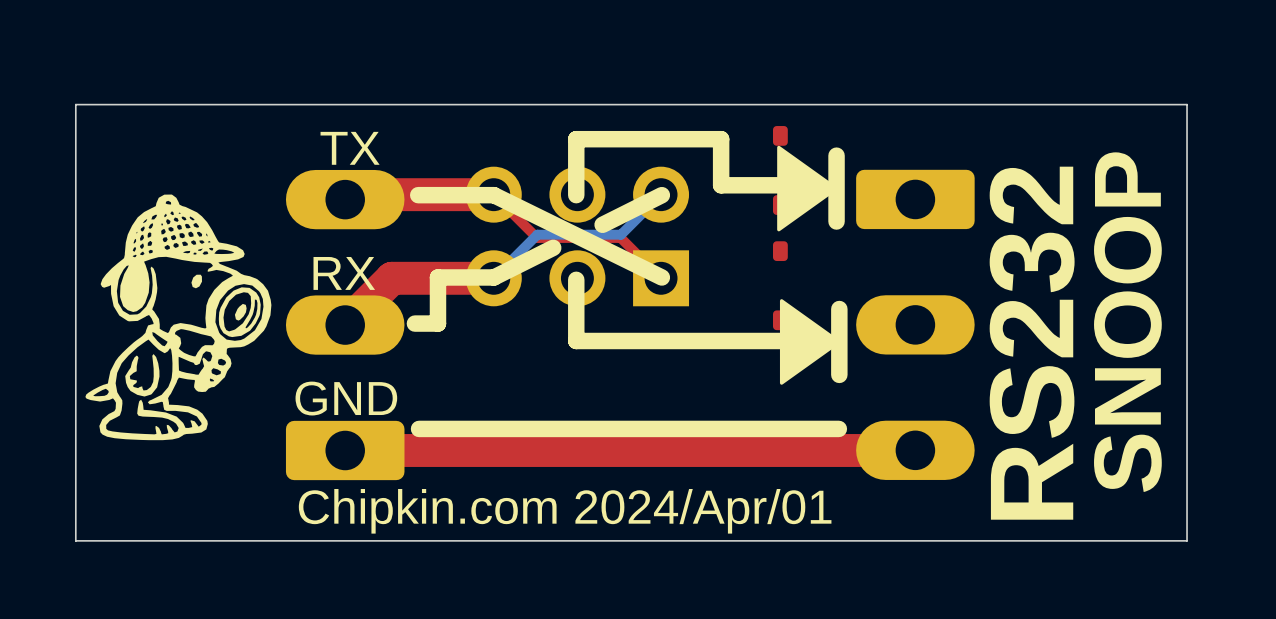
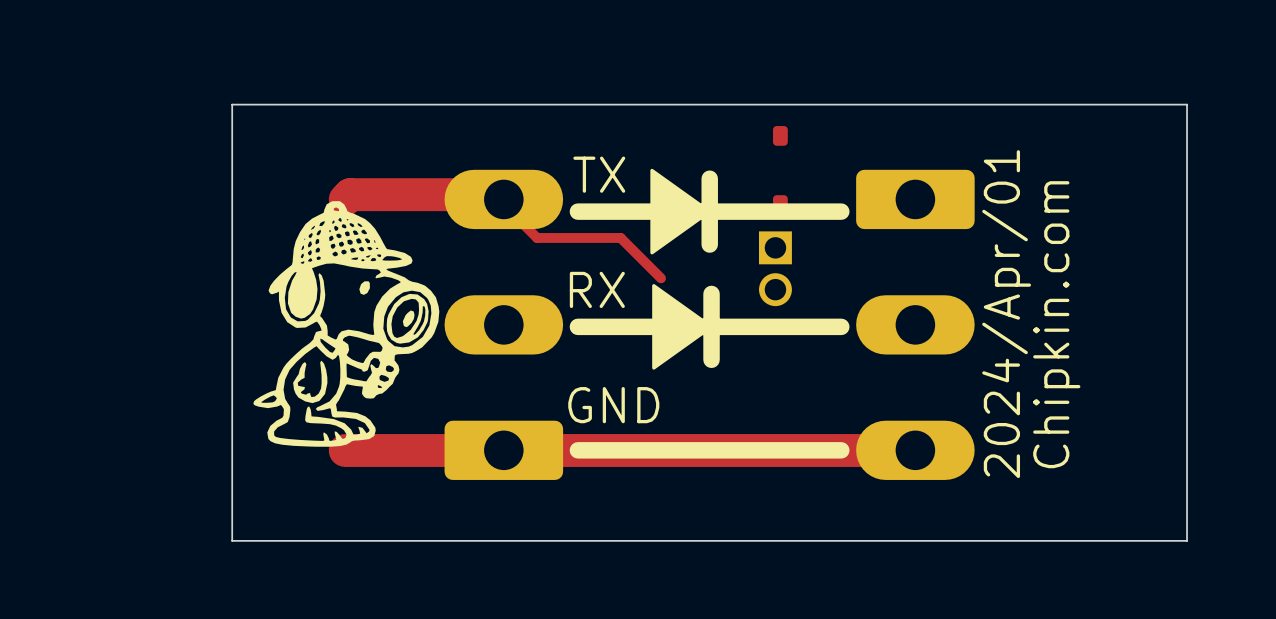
board edge: (232, 104) (75, 104) (75, 540) (232, 540) -> (232, 104) (232, 540)
drawing: [777, 145, 839, 232] -> none
text position: TX (350, 148) -> TX (599, 174)
line: (836, 155) (836, 221) -> (709, 178) (709, 244)
drawing: none -> [650, 168, 714, 370]
line: (777, 185) (721, 185) (721, 139) (576, 139) (576, 195) -> none
bottom track: (661, 194) (621, 234) (537, 234) (493, 278) -> none
line: (418, 195) (493, 195) (661, 277) -> none
line: (661, 195) (602, 224) -> none
line: none -> (660, 211) (577, 211)
line: none -> (841, 211) (684, 211)
part: (577, 236) -> none
part footprint: [772, 241, 788, 331] -> [759, 231, 792, 307]
line: (553, 247) (493, 277) (437, 277) (437, 323) (414, 323) -> none
text position: RX (344, 273) -> RX (597, 289)
top track: (493, 278) (391, 278) (345, 325) -> none
line: (576, 279) (576, 341) (790, 341) -> none
drawing: [779, 299, 841, 385] -> none
line: (839, 309) (839, 374) -> (711, 293) (711, 359)
drawing position: (178, 317) -> (346, 323)
text: SNOOP (1127, 322) -> none
part position: (345, 325) -> (503, 324)
line: none -> (651, 326) (577, 326)
line: none -> (841, 326) (684, 326)
text: RS232 (1032, 343) -> none
text: none -> Chipkin.com (1056, 324)
text: none -> 2024/Apr/01 (1006, 314)
text position: GND (346, 398) -> GND (613, 405)
line: (838, 428) (419, 428) -> none
line: none -> (841, 450) (577, 450)
text: Chipkin.com 2024/Apr/01 (565, 511) -> none

